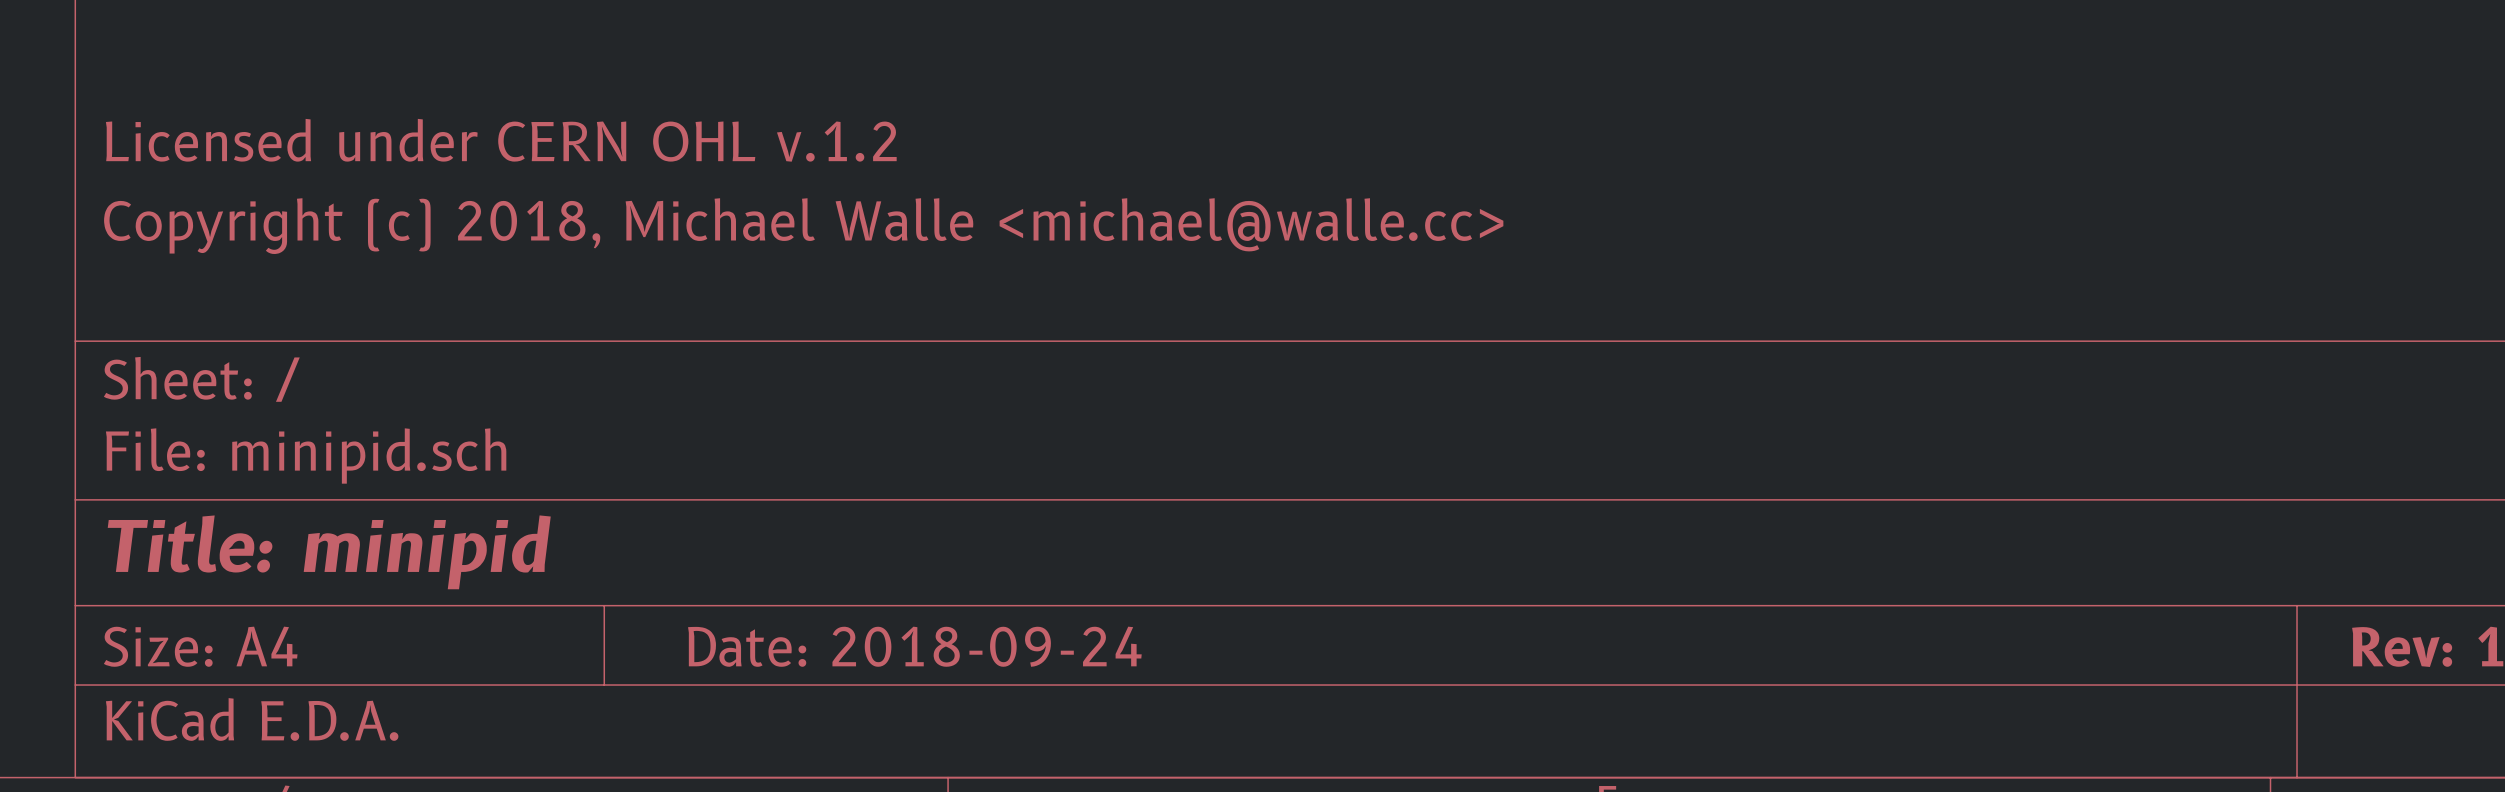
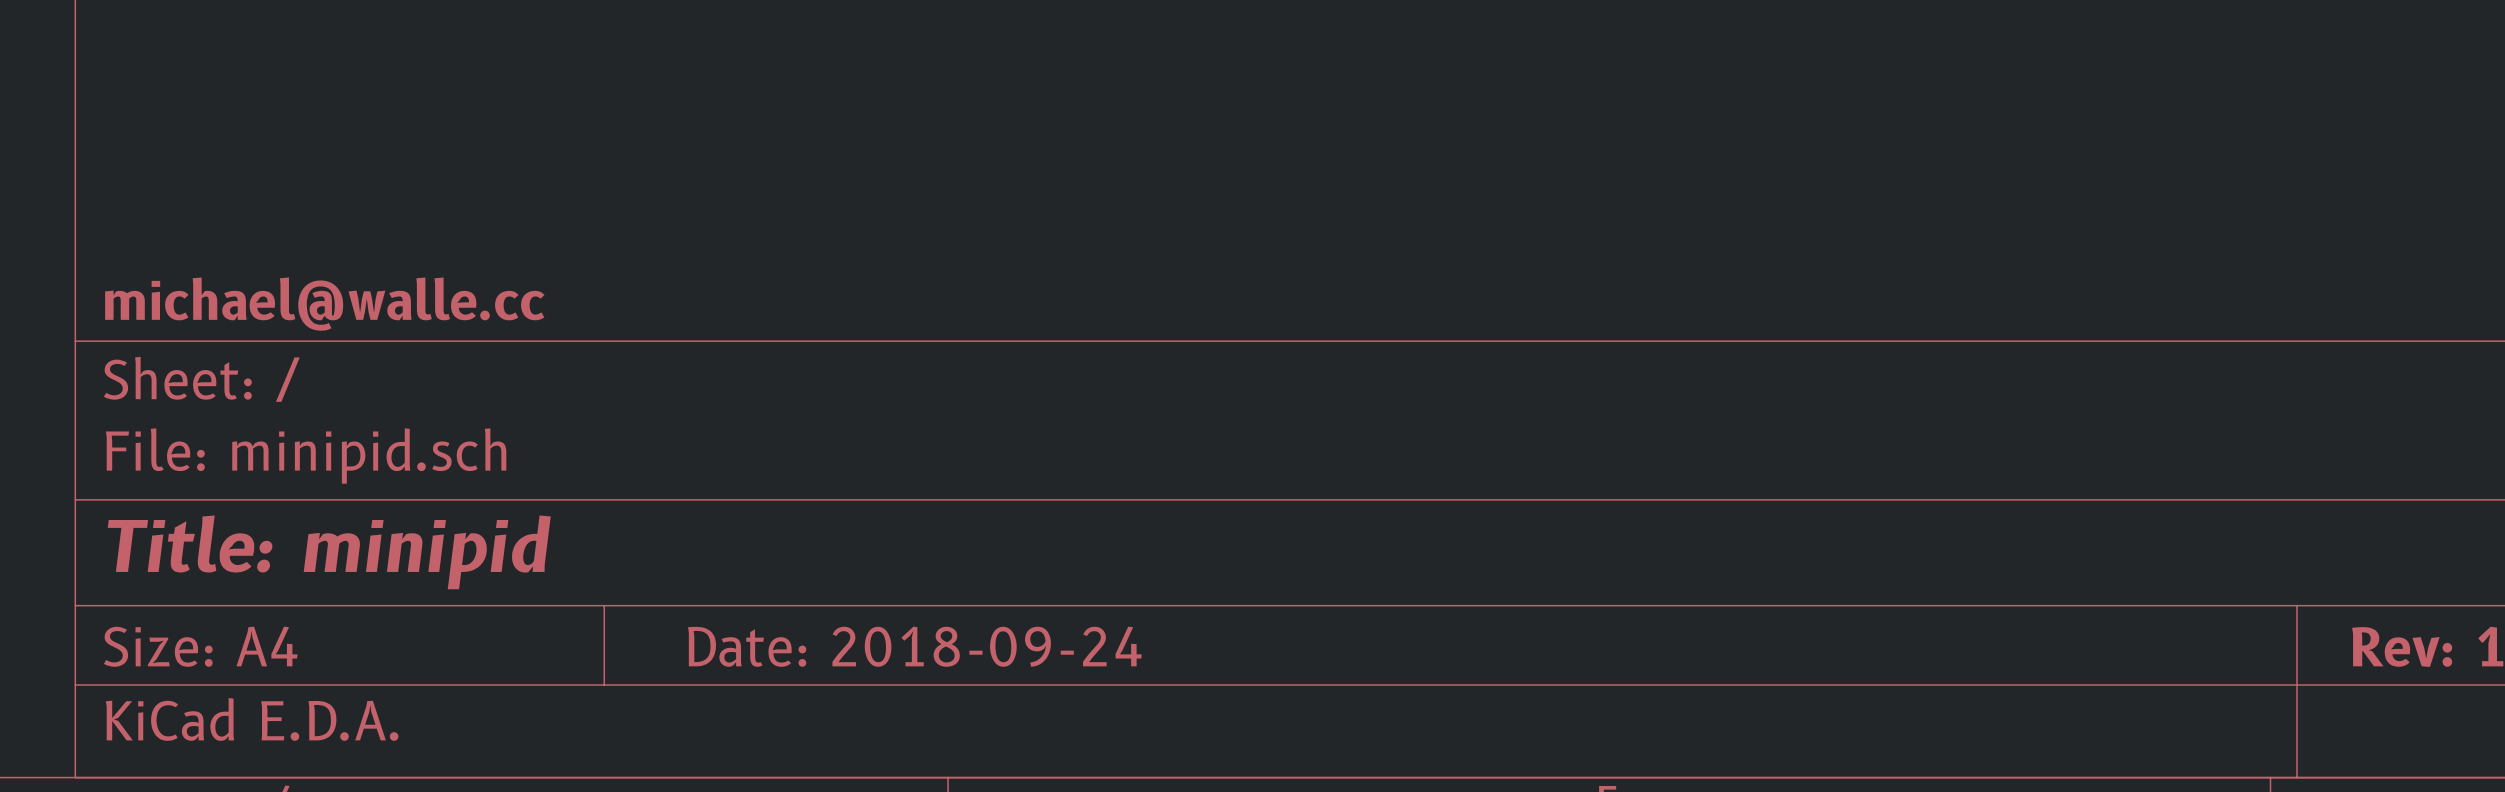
title block: Licensed under CERN OHL v.1.2 (501, 140) -> none
title block: Copyright (c) 2018, Michael Walle <michael@walle.cc> (803, 226) -> none
title block: none -> michael@walle.cc (324, 304)

